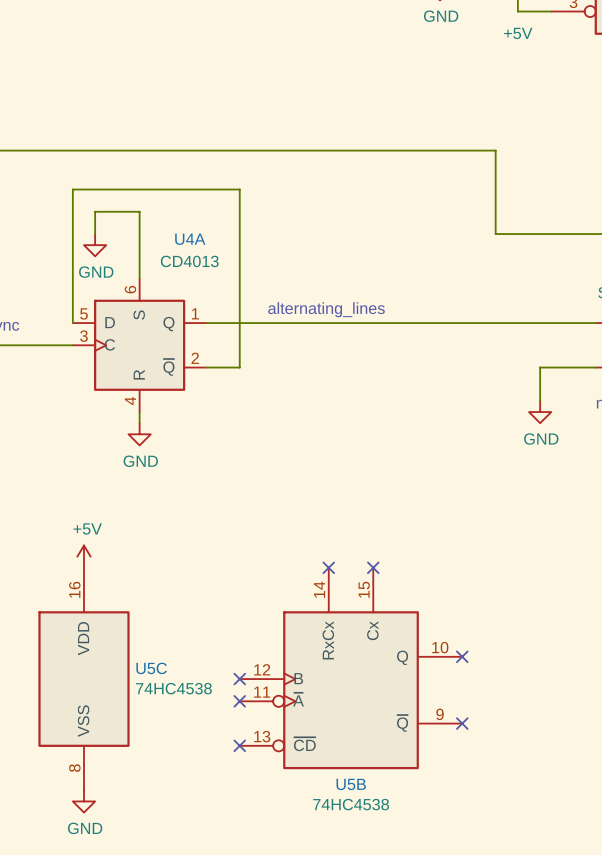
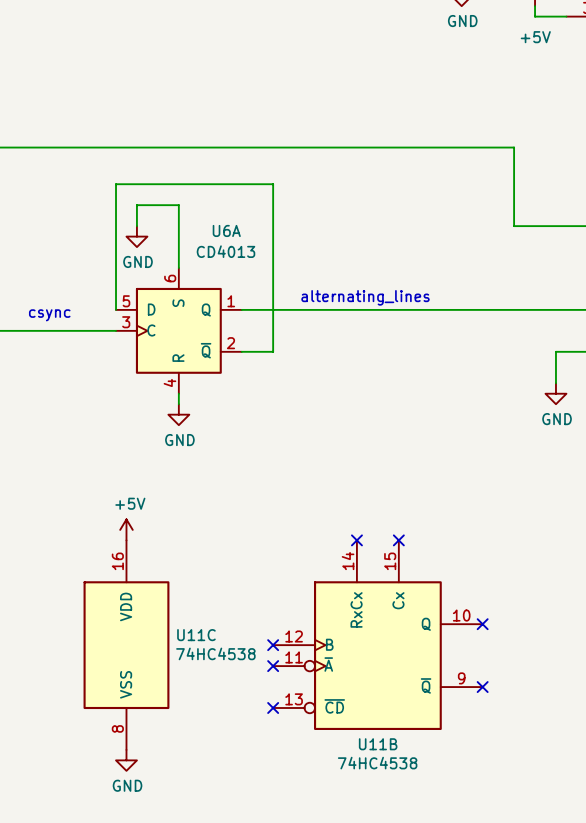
U4A name: U4A (190, 239) -> U6A (226, 230)
U5C name: U5C (151, 668) -> U11C (196, 635)
U5B name: U5B (351, 784) -> U11B (378, 744)

